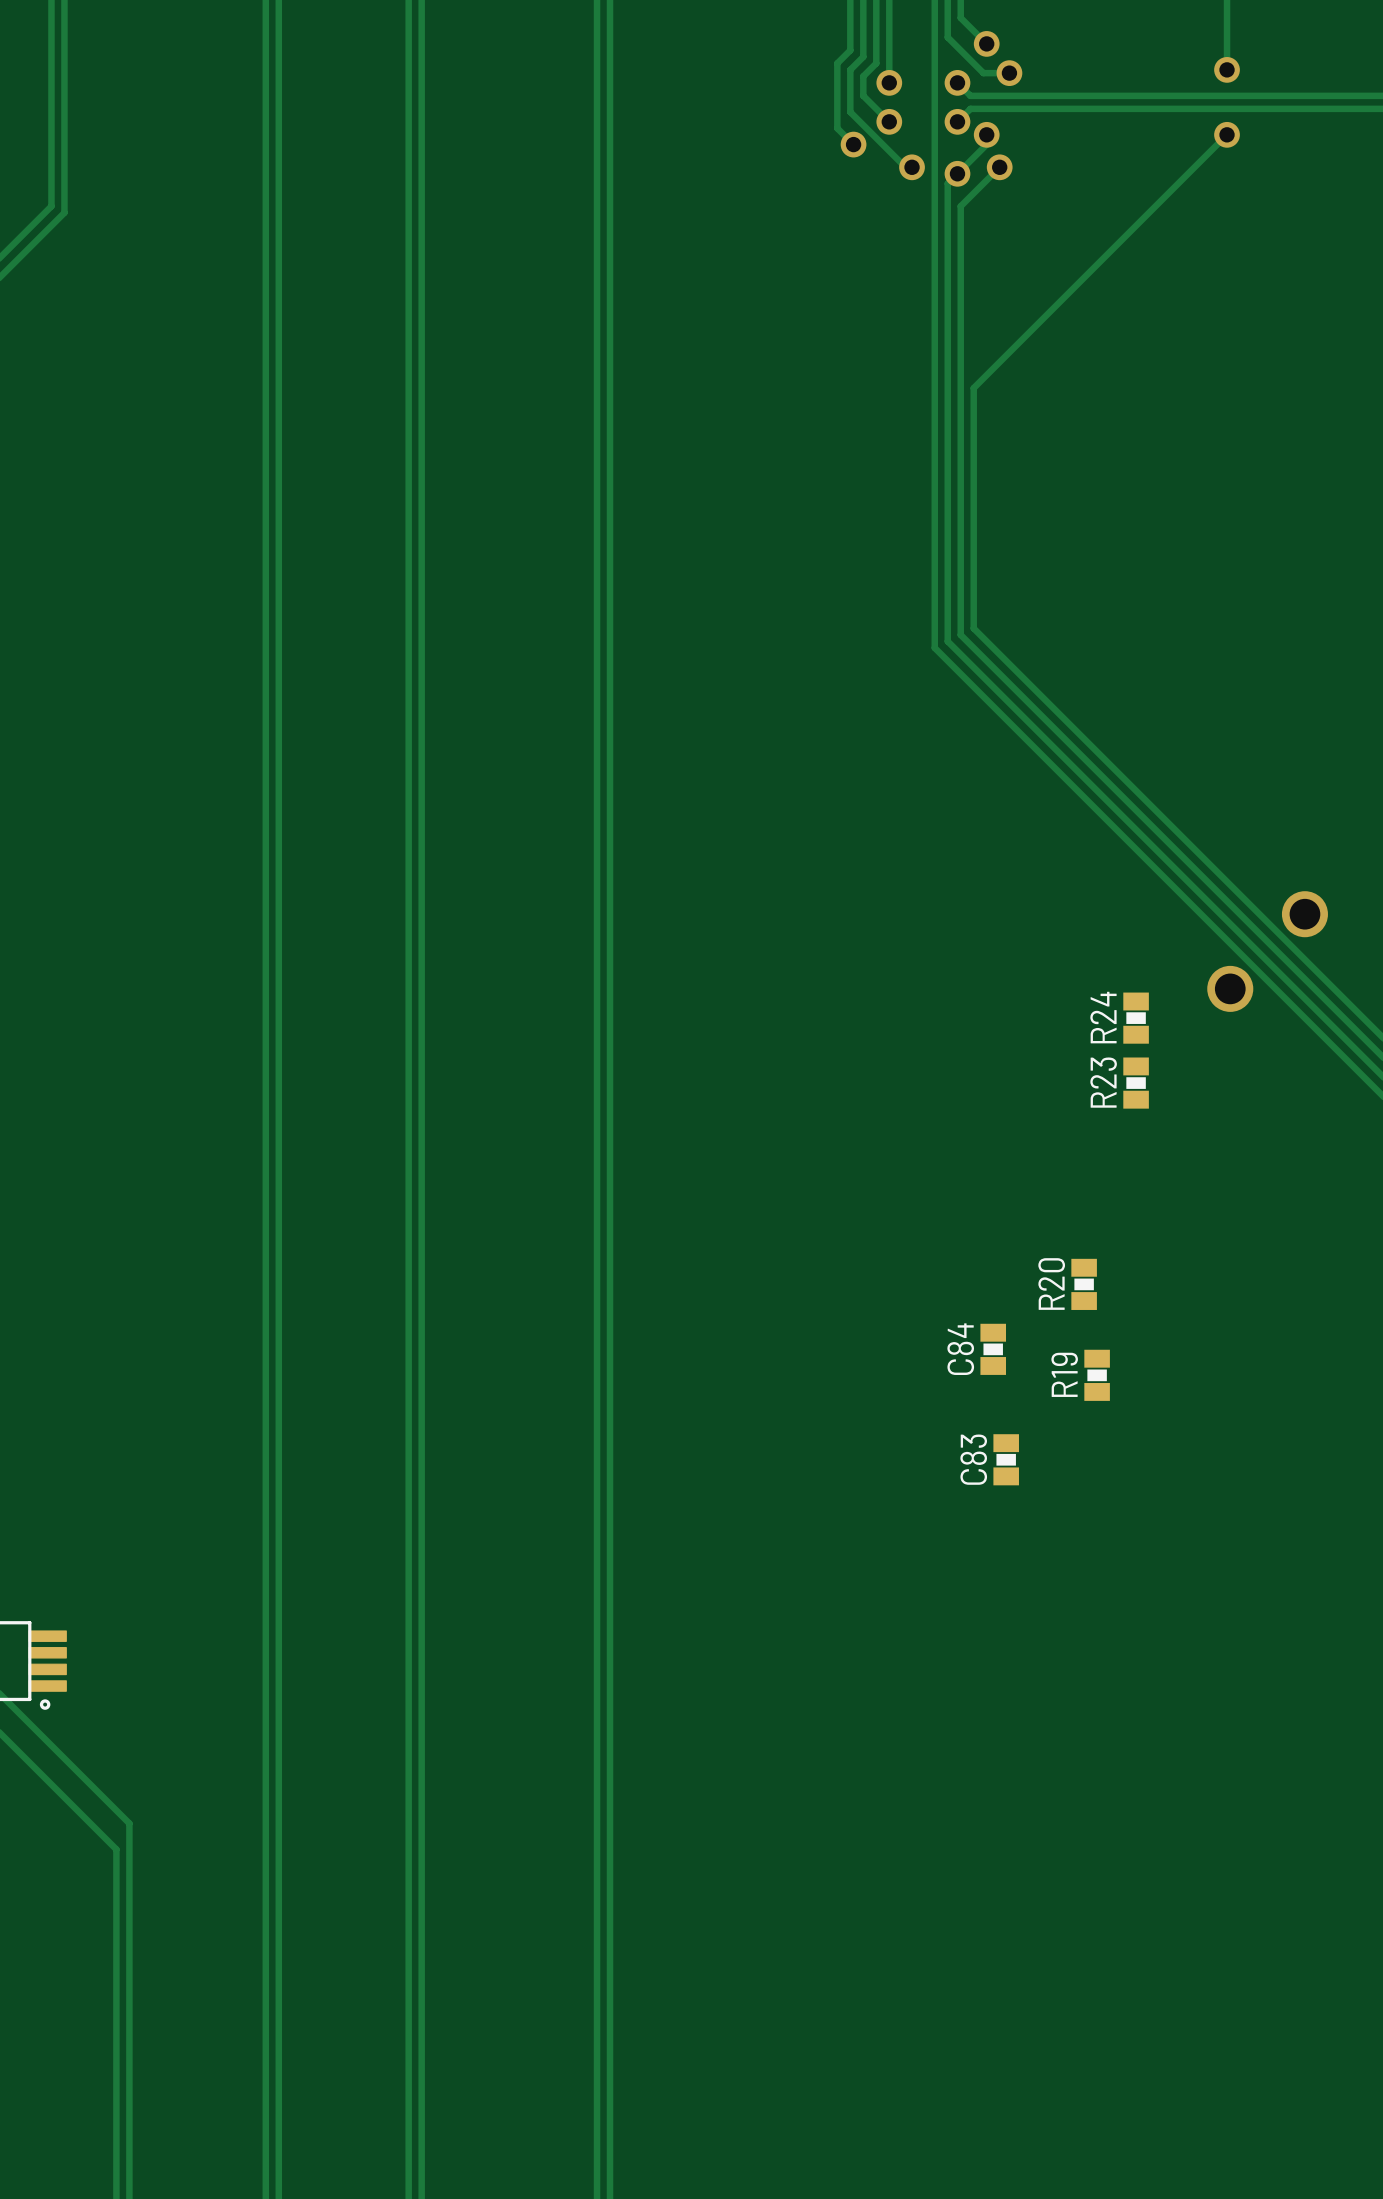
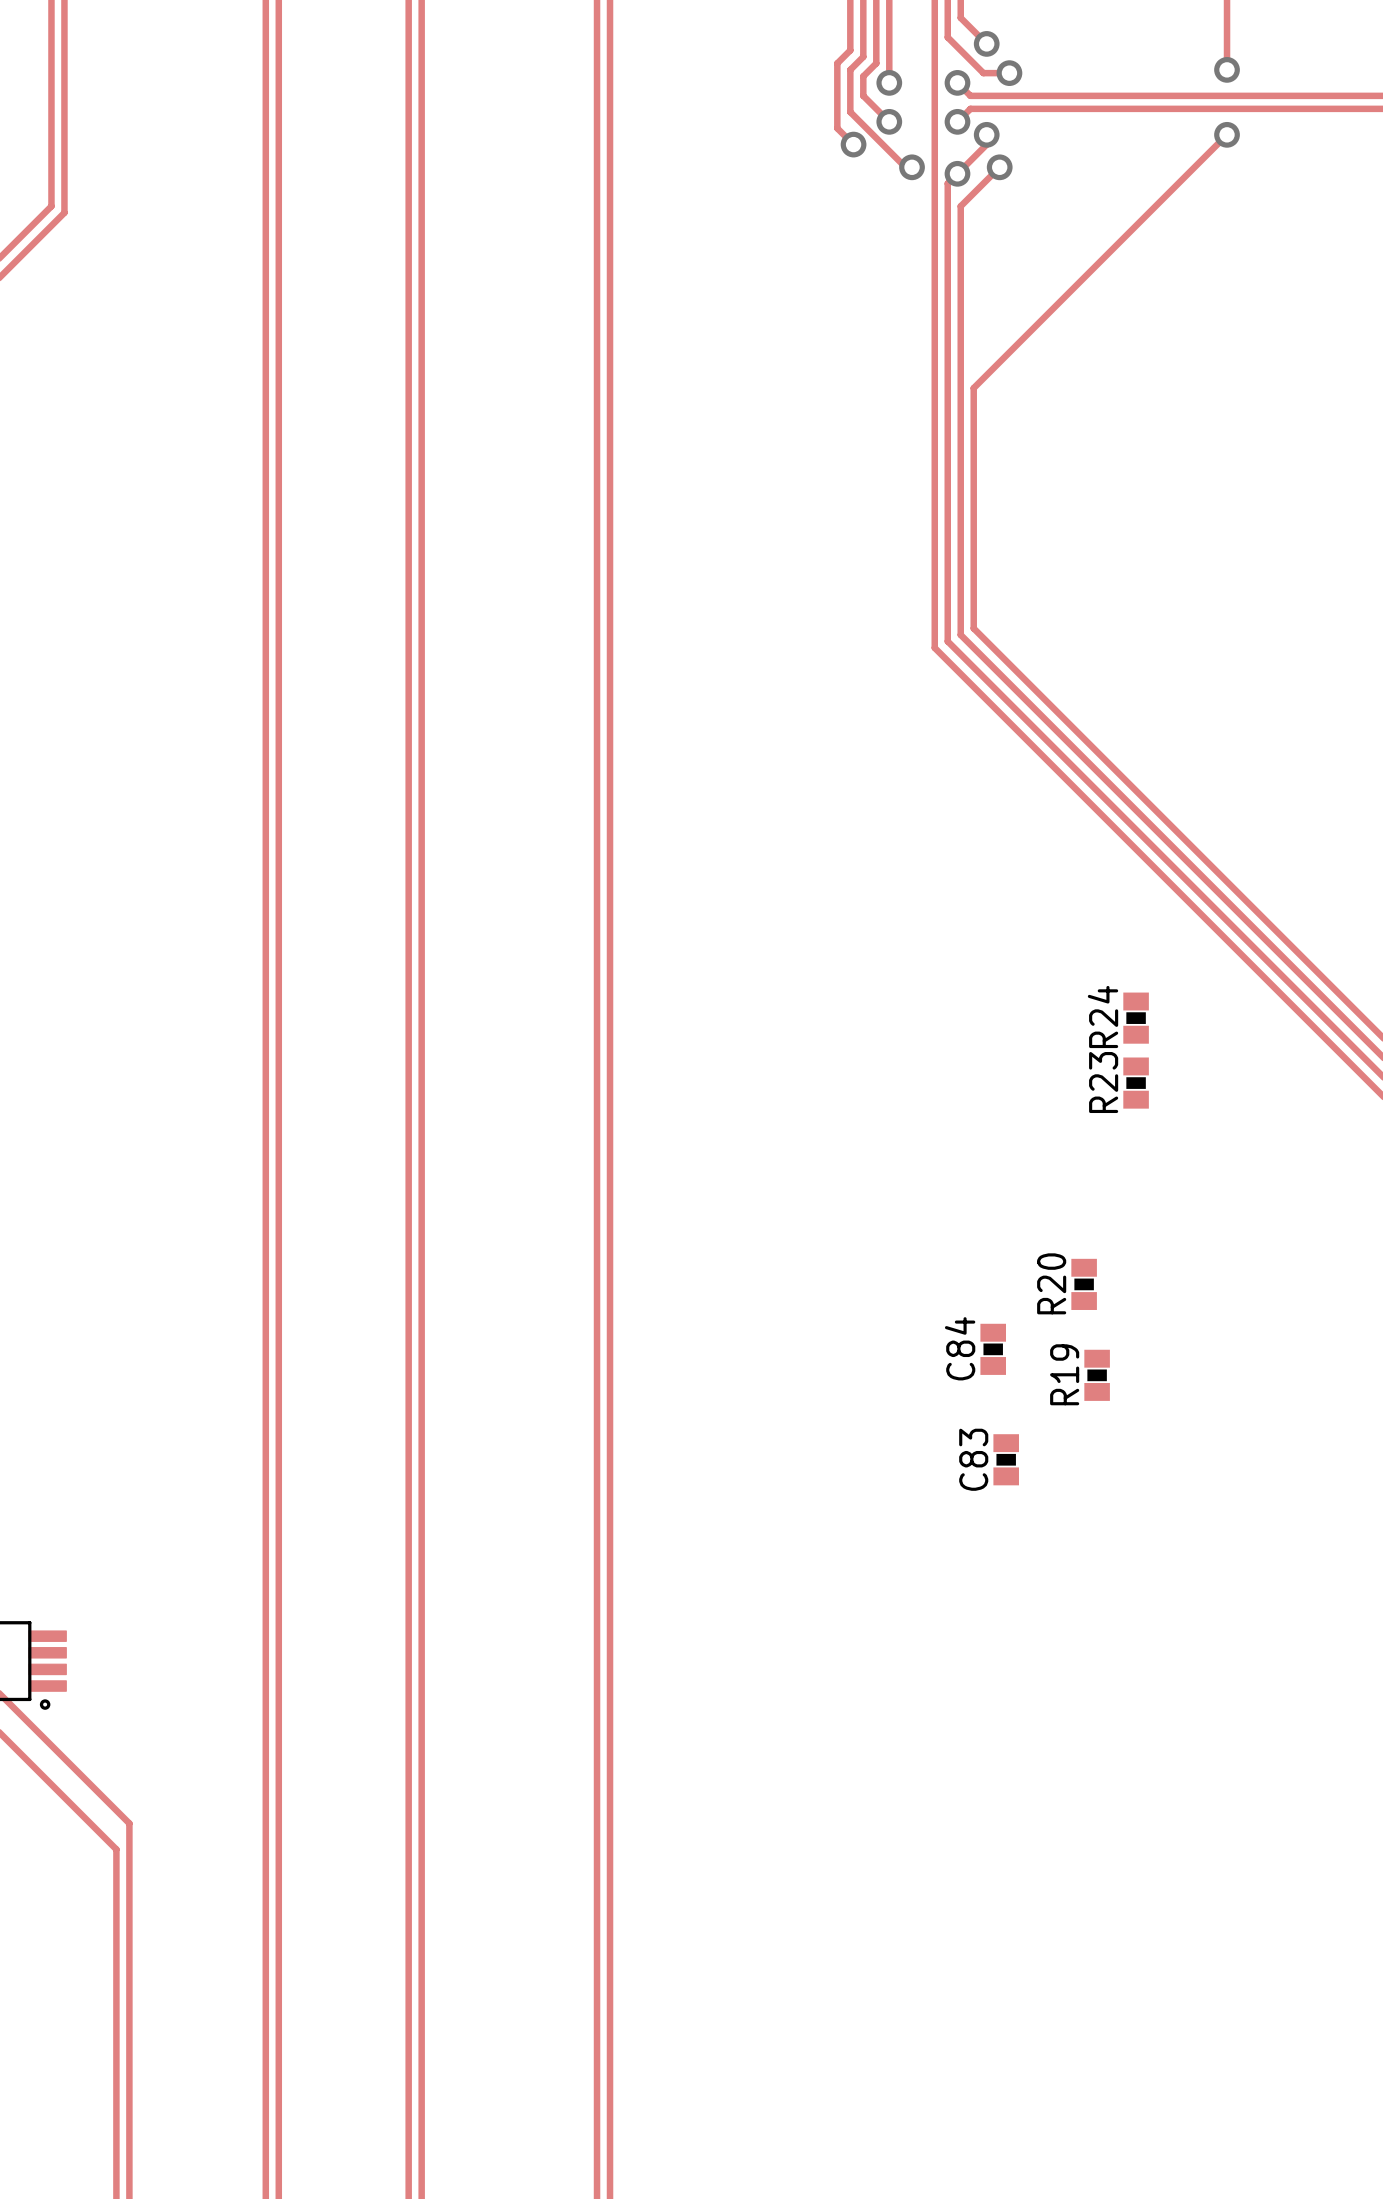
via: (1304, 914) -> none
via: (1230, 988) -> none

